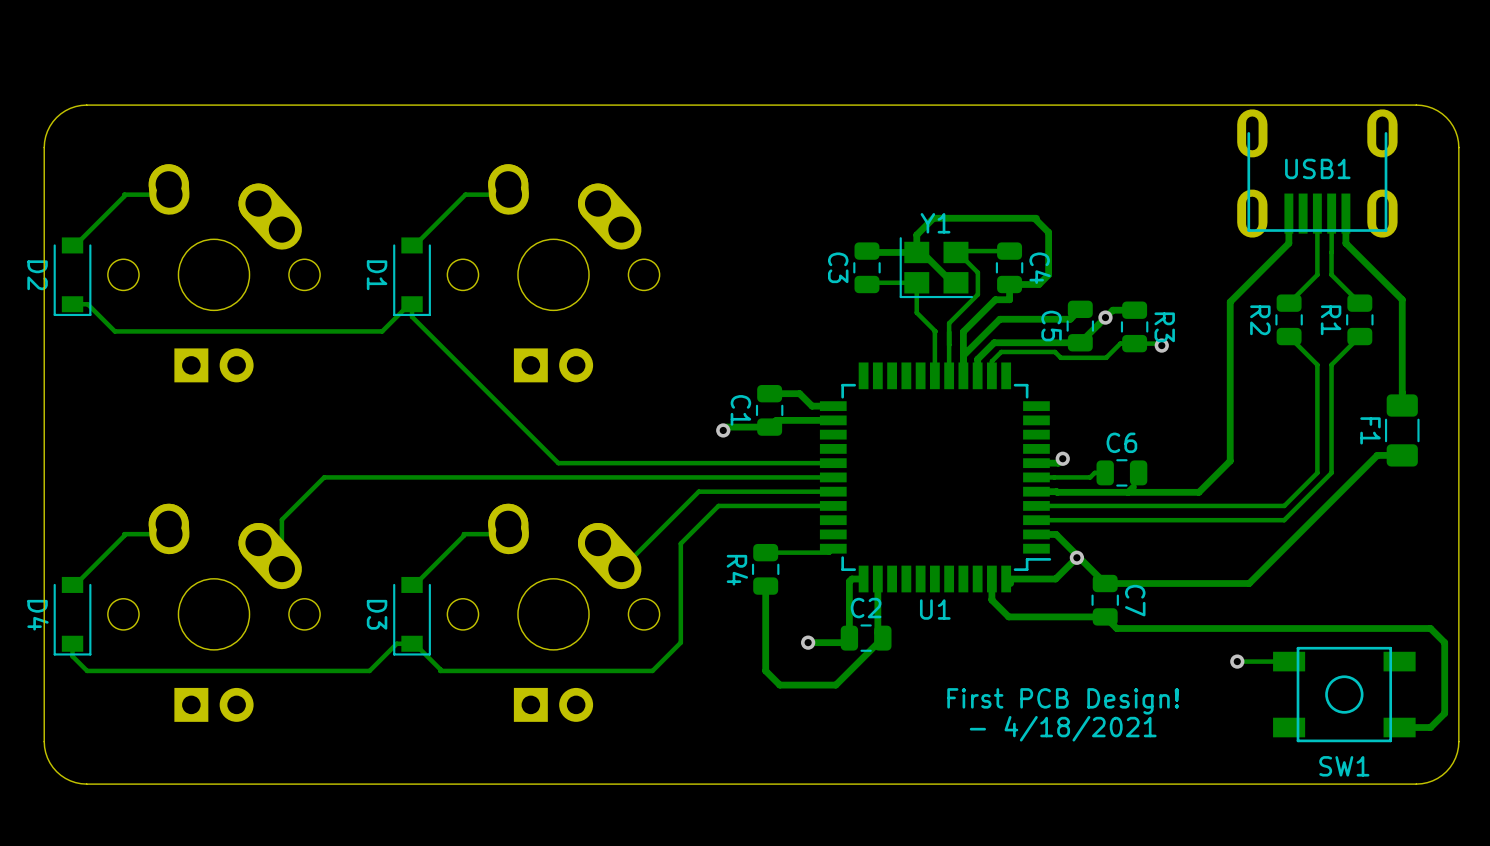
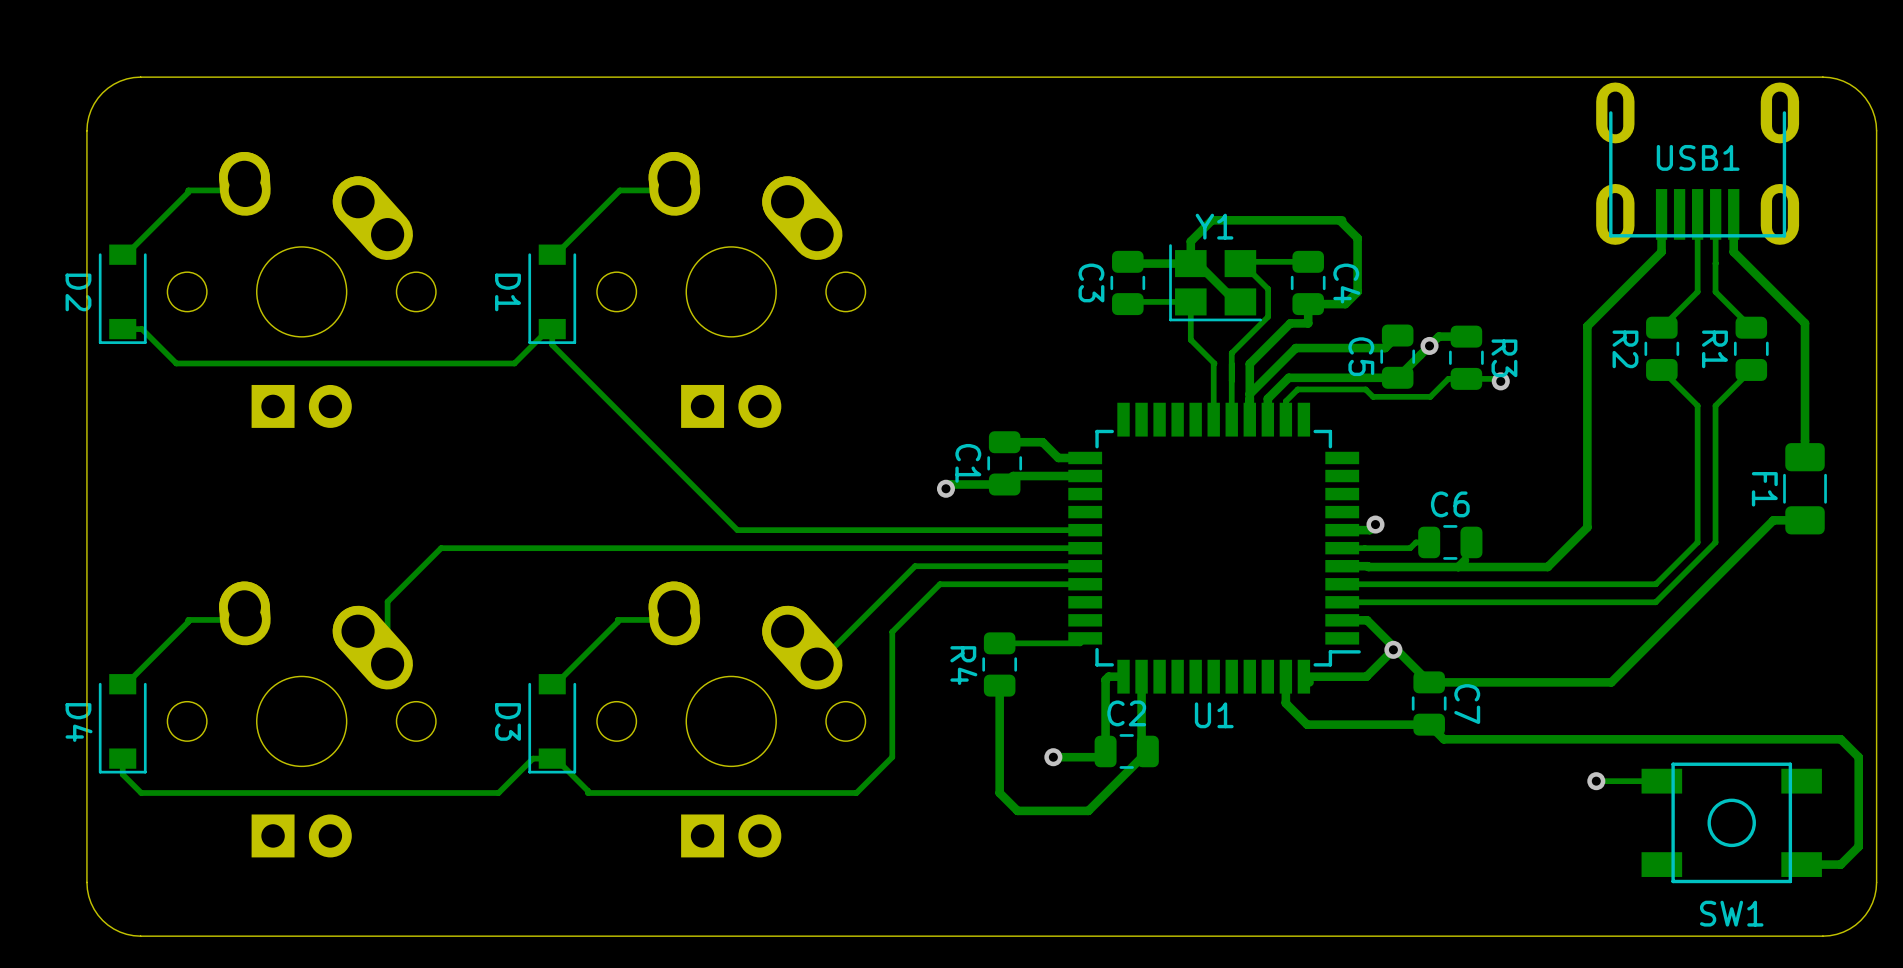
text: First PCB Design! (1063, 701) -> none
text: - 4/18/2021 (1063, 728) -> none

